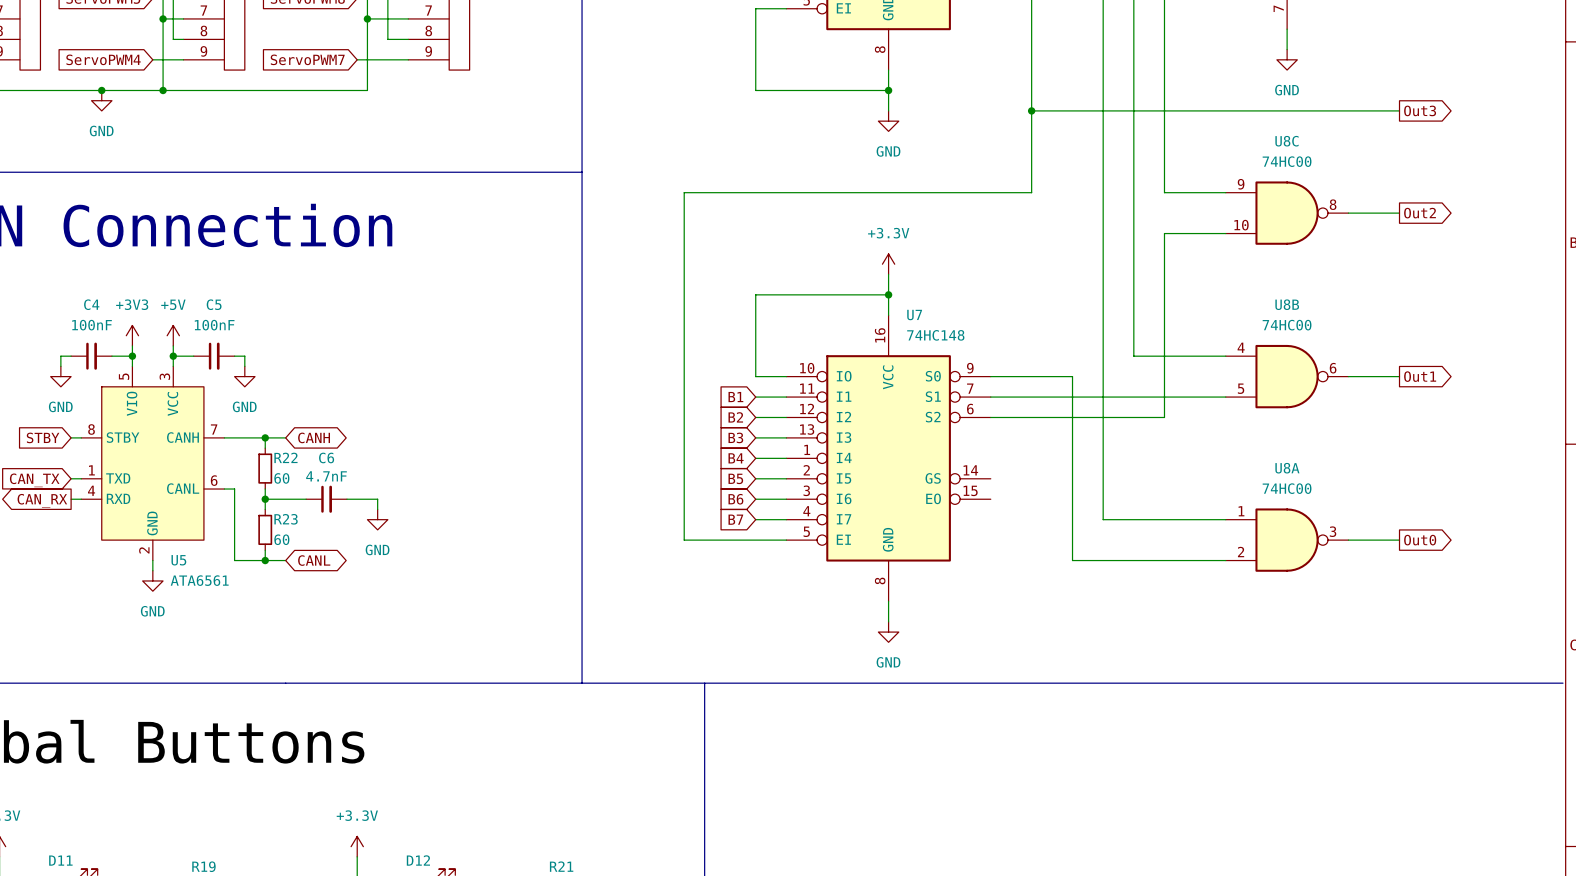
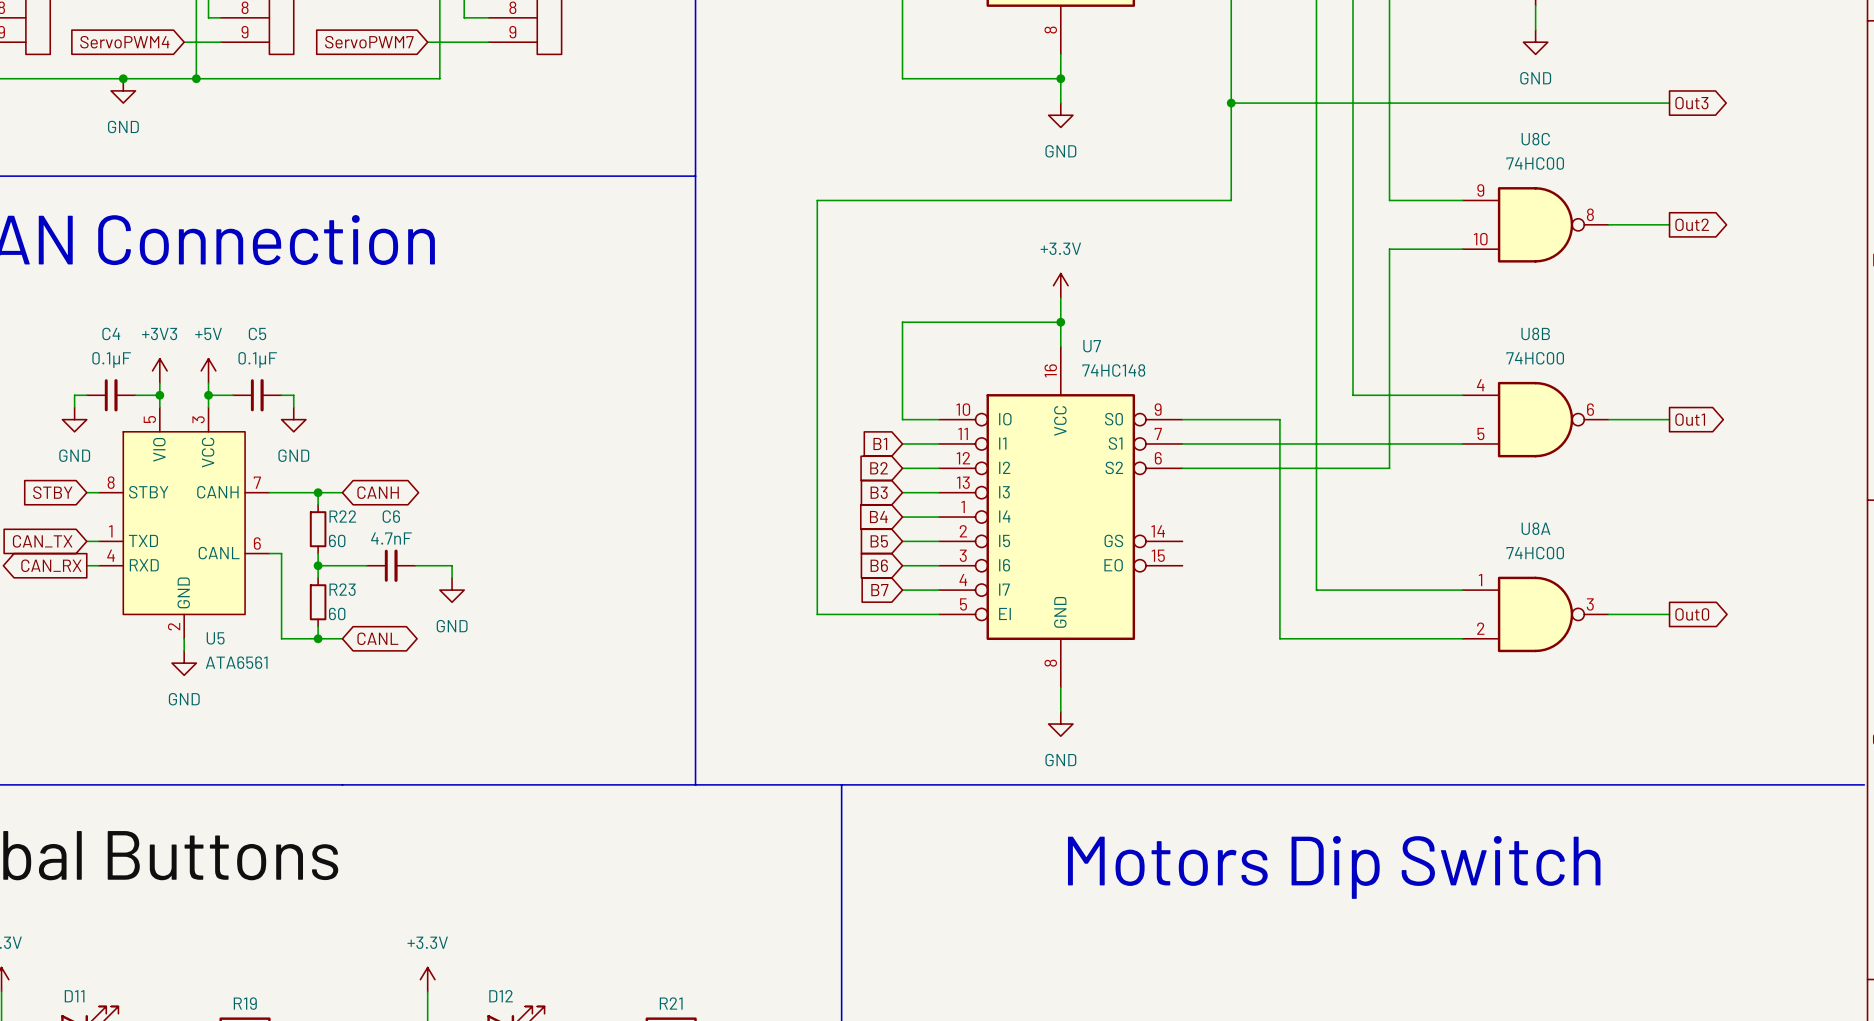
C4 value: 100nF (92, 325) -> 0.1µF (111, 359)
C5 value: 100nF (214, 325) -> 0.1µF (257, 359)
text: none -> Motors Dip Switch (1334, 867)

